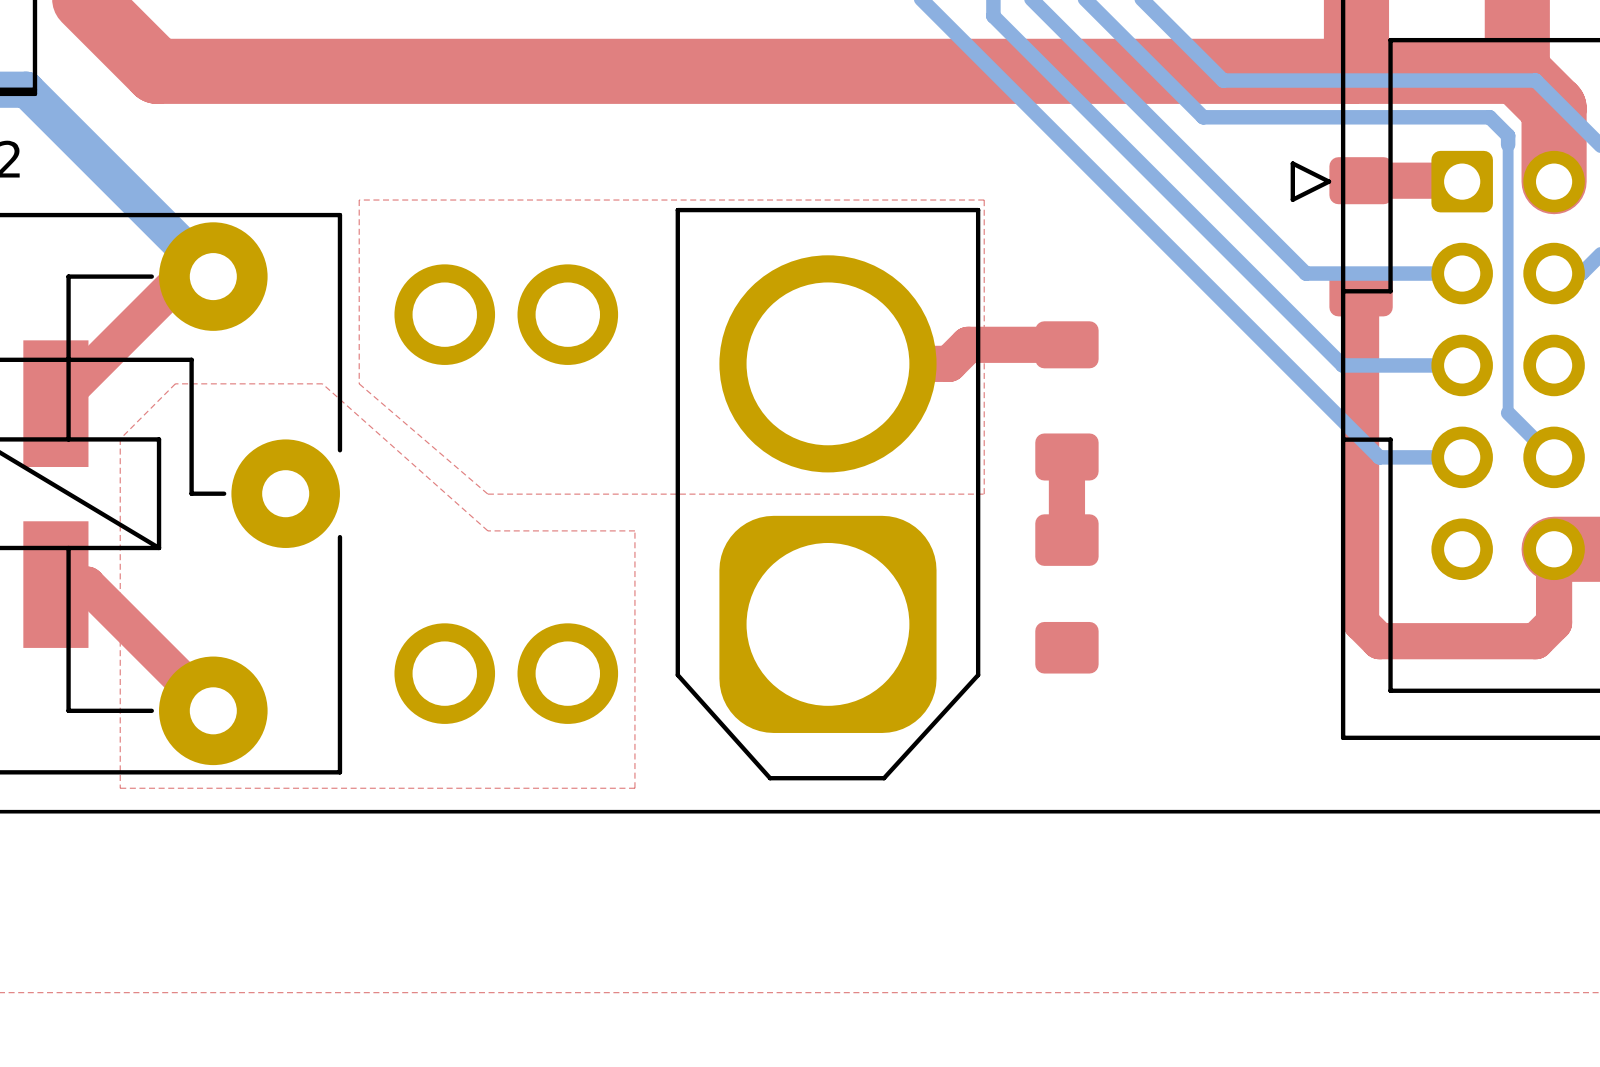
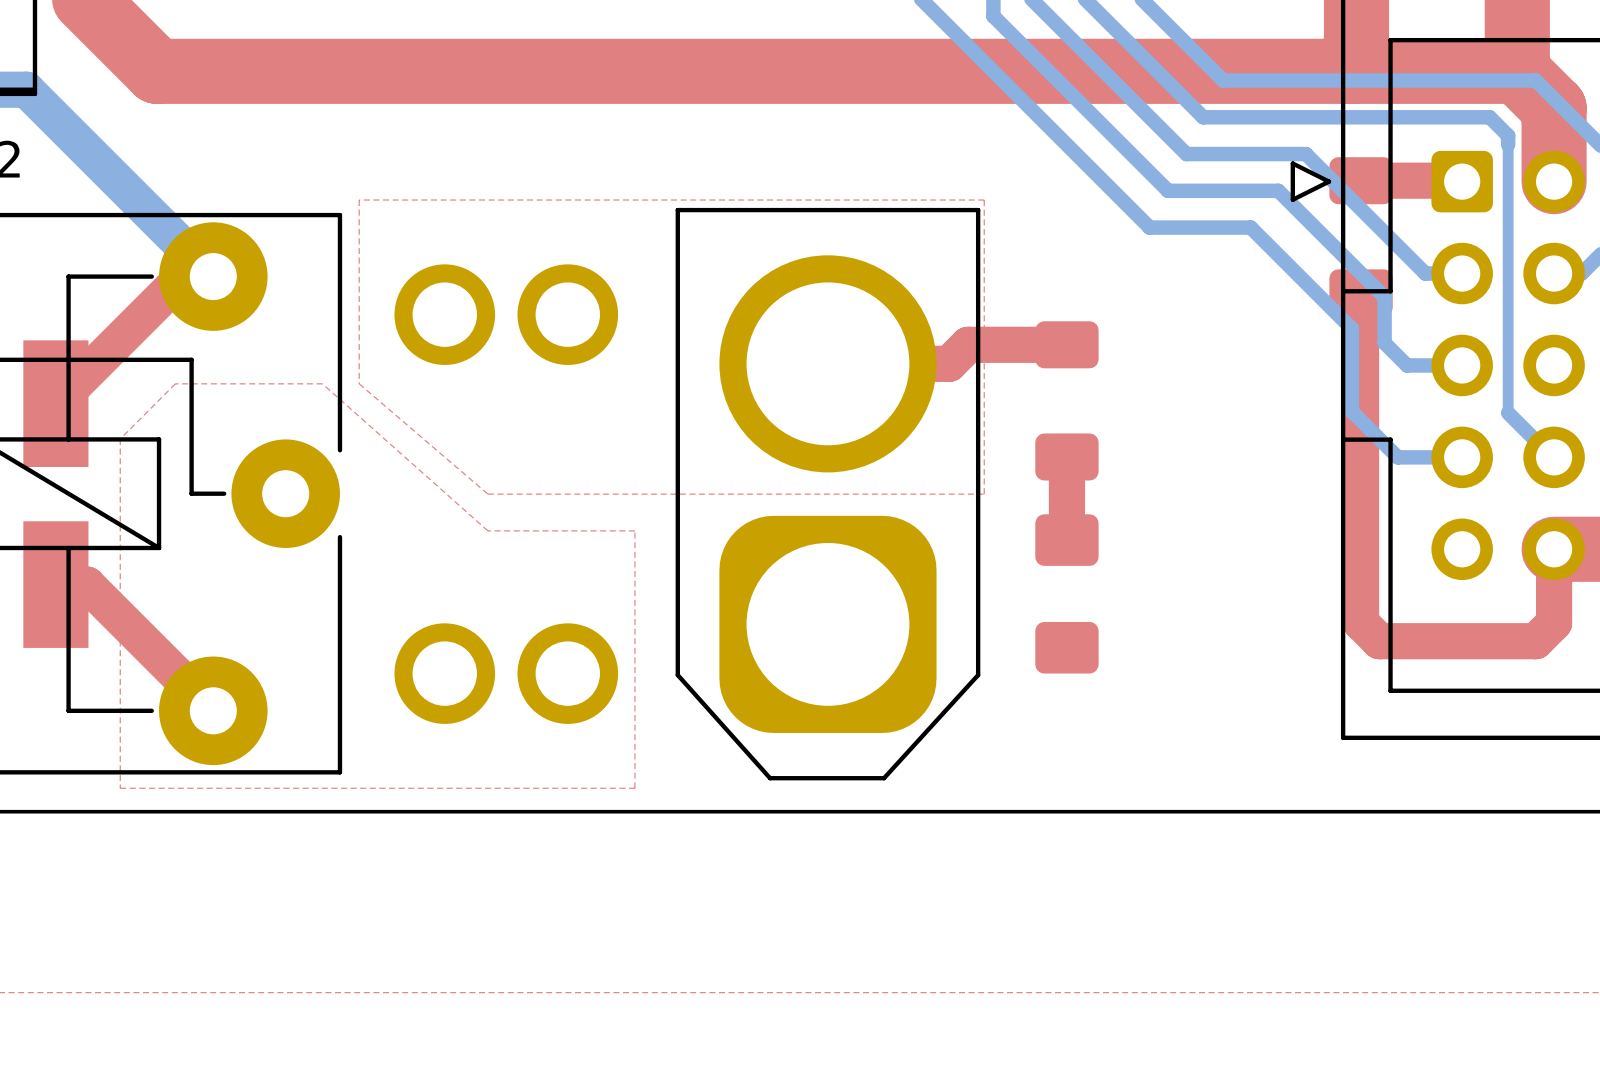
bottom track: (1186, 154) (1305, 273) (1425, 273) -> (1186, 154) (1305, 154) (1425, 273)
bottom track: (1168, 190) (1342, 365) (1407, 365) -> (1168, 190) (1278, 190) (1384, 297) (1384, 343) (1407, 365)
bottom track: (1149, 227) (1379, 457) (1397, 457) -> (1149, 227) (1250, 227) (1351, 328) (1351, 411) (1397, 457)

